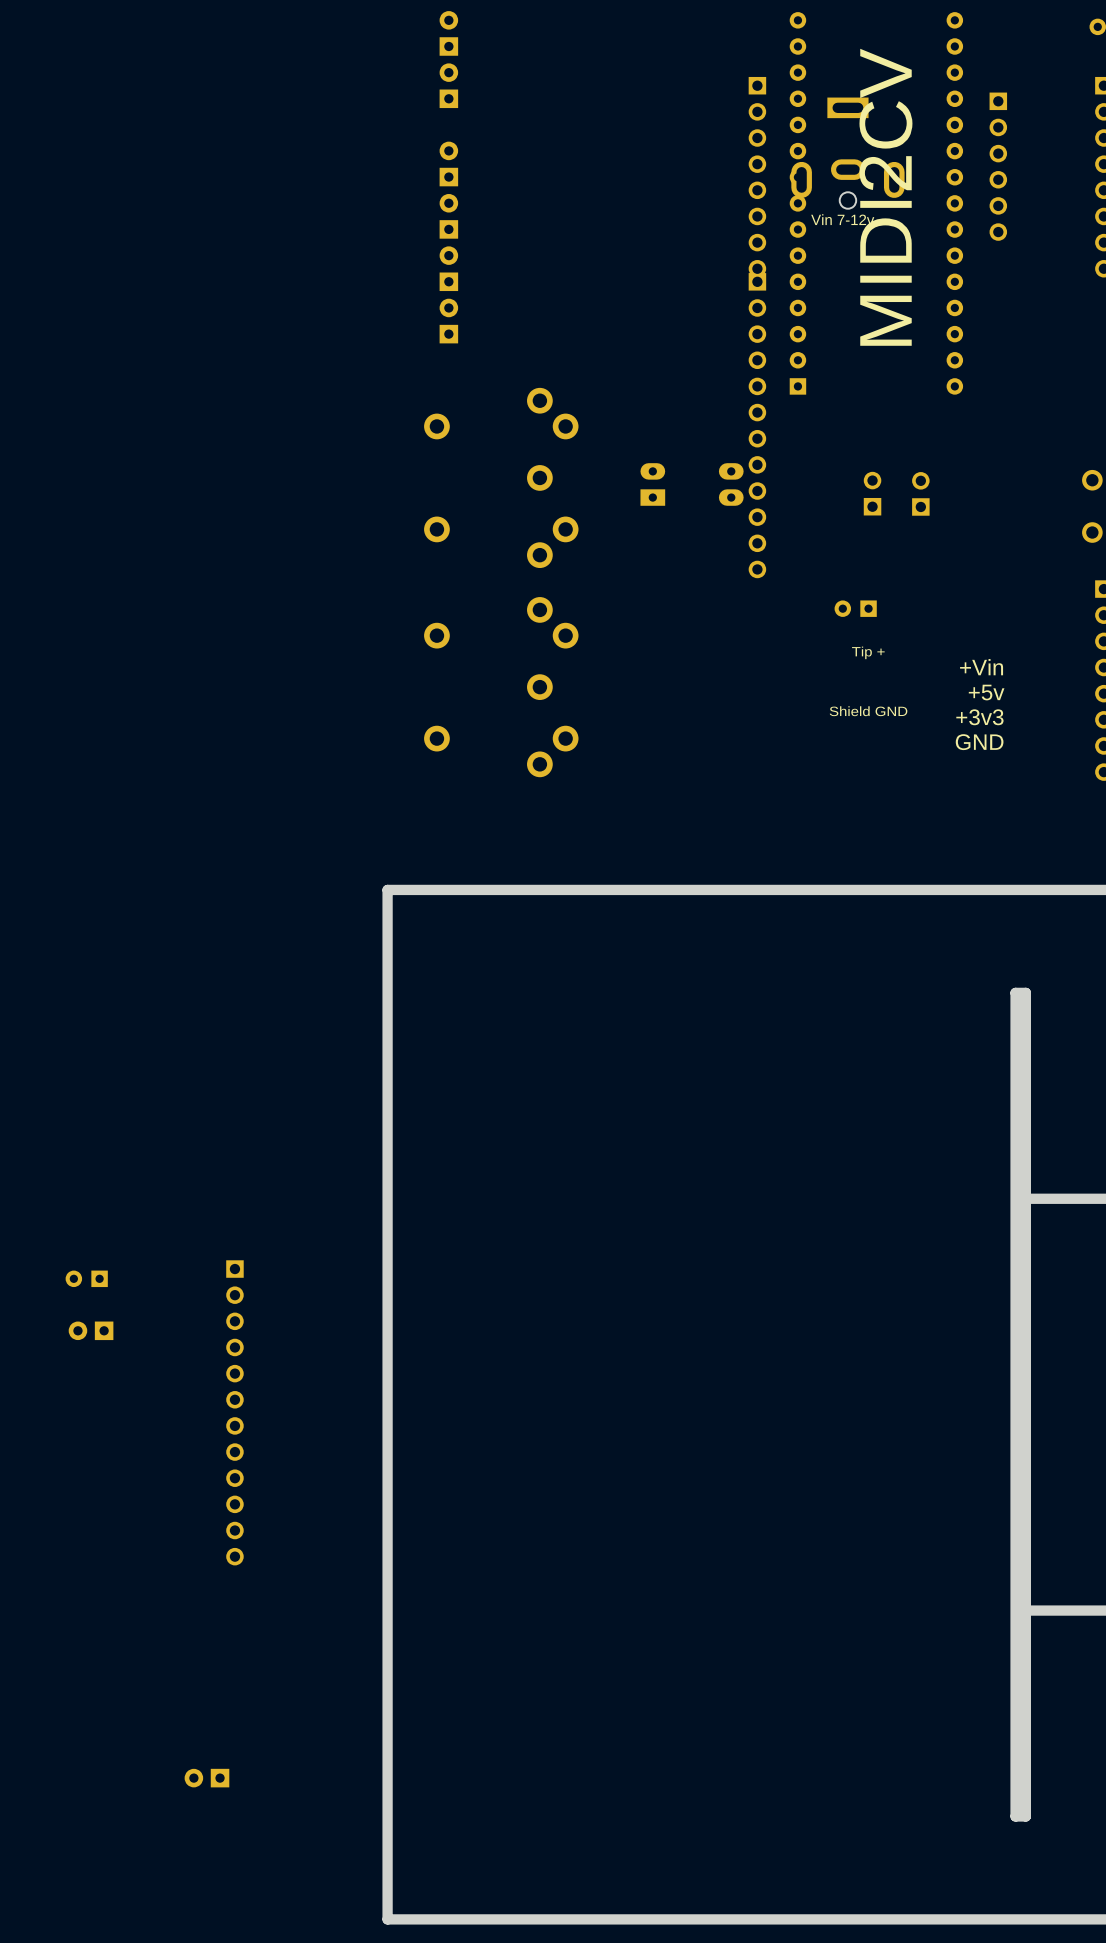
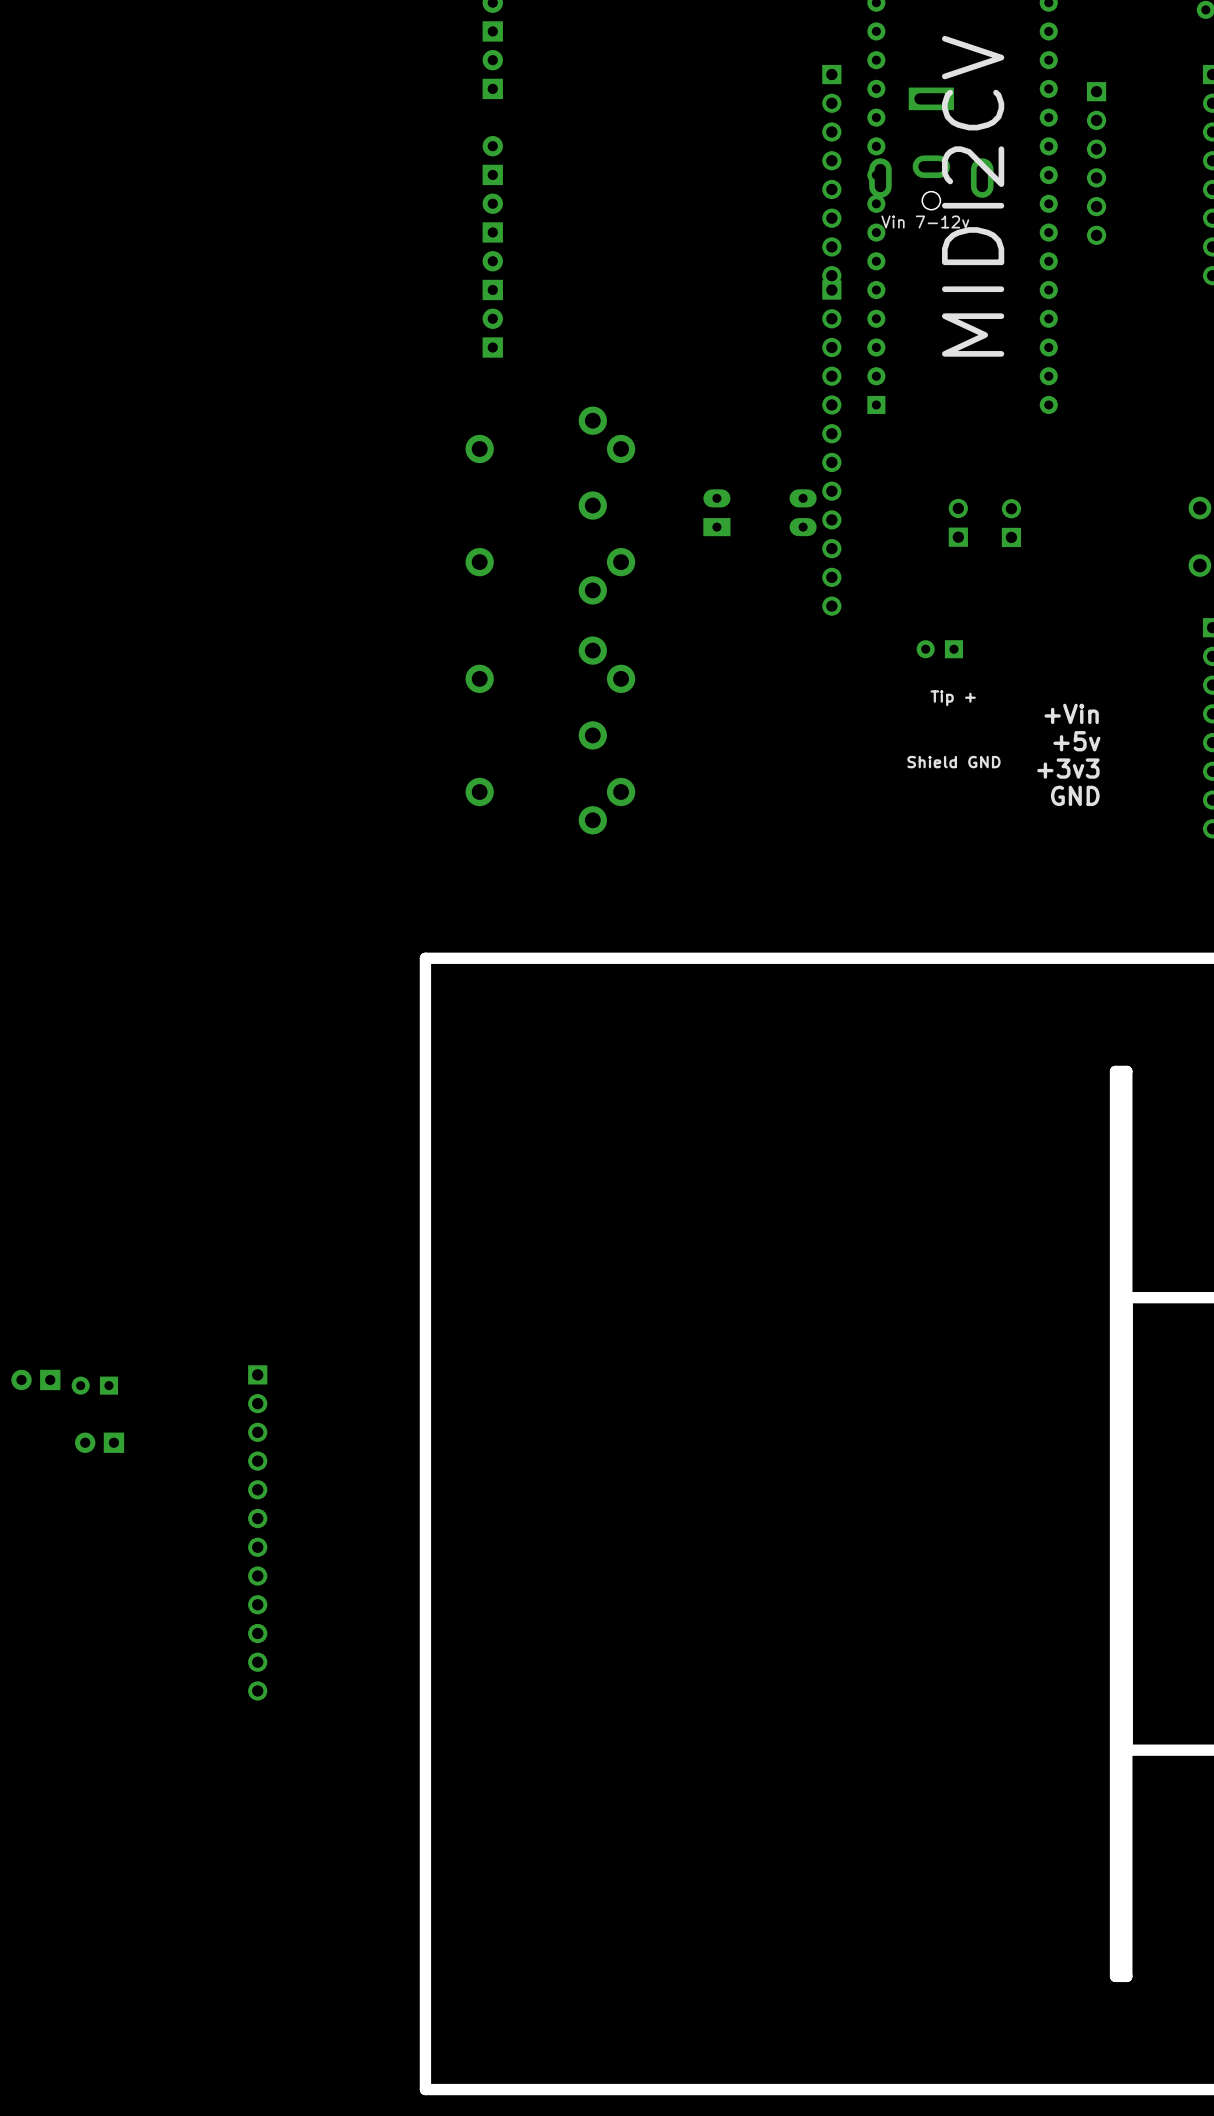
part: none -> (35, 1379)
part: (206, 1778) -> none

